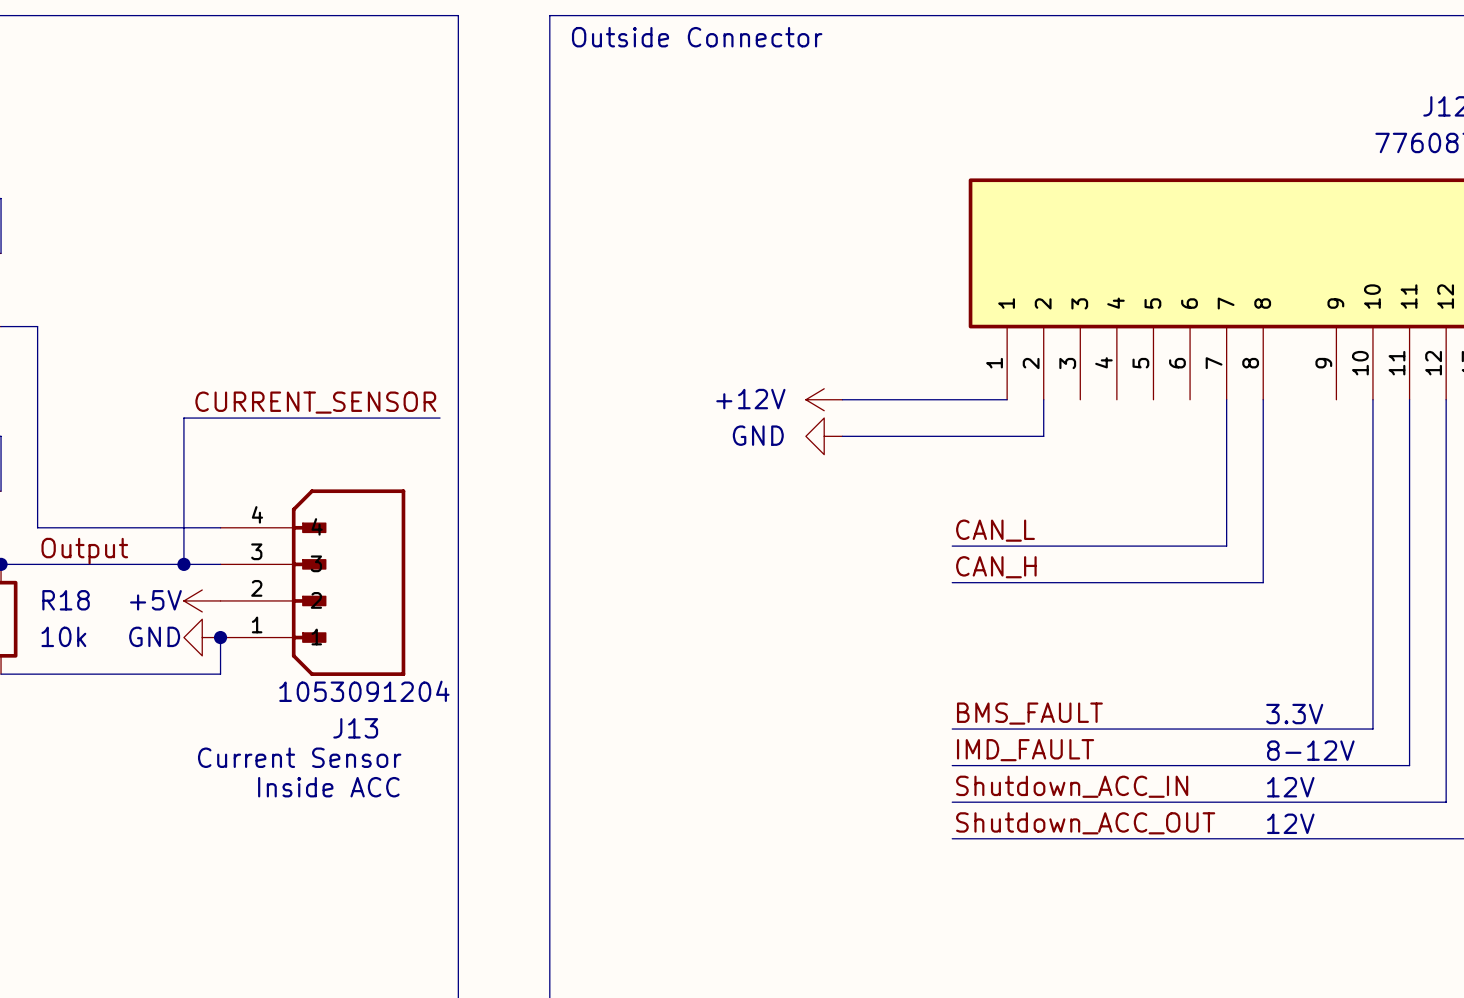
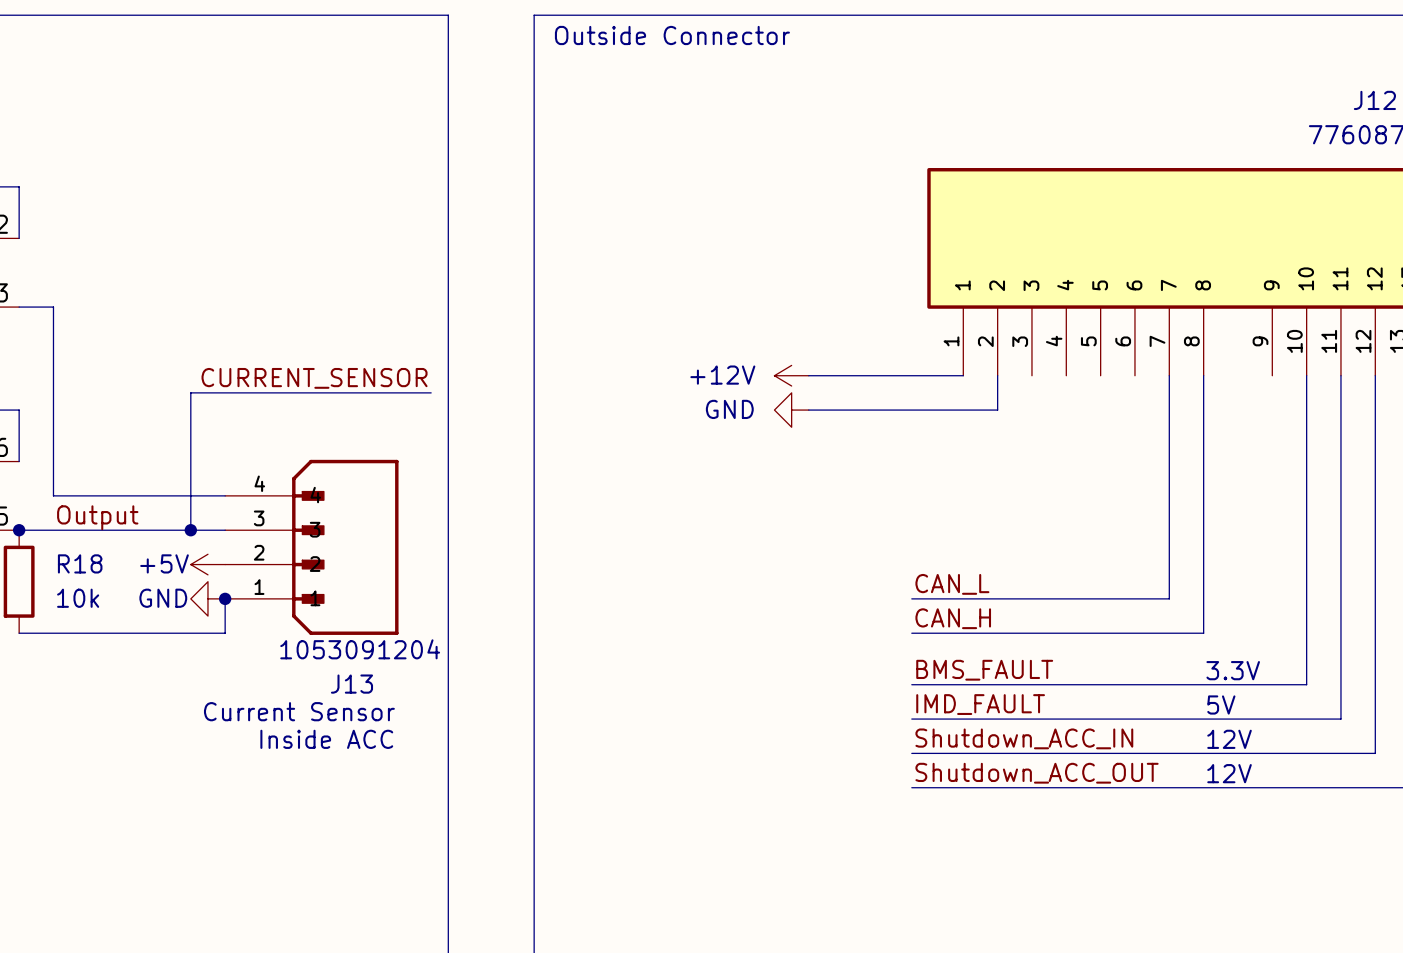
label position: CAN_L (995, 530) -> CAN_L (952, 584)
wire: (952, 546) (1226, 546) -> (911, 598) (1169, 598) (1169, 513)
label position: CAN_H (996, 567) -> CAN_H (953, 618)
wire: (952, 582) (1263, 582) -> (911, 633) (1203, 633) (1203, 547)
text: 8-12V (1310, 750) -> 5V (1221, 704)

